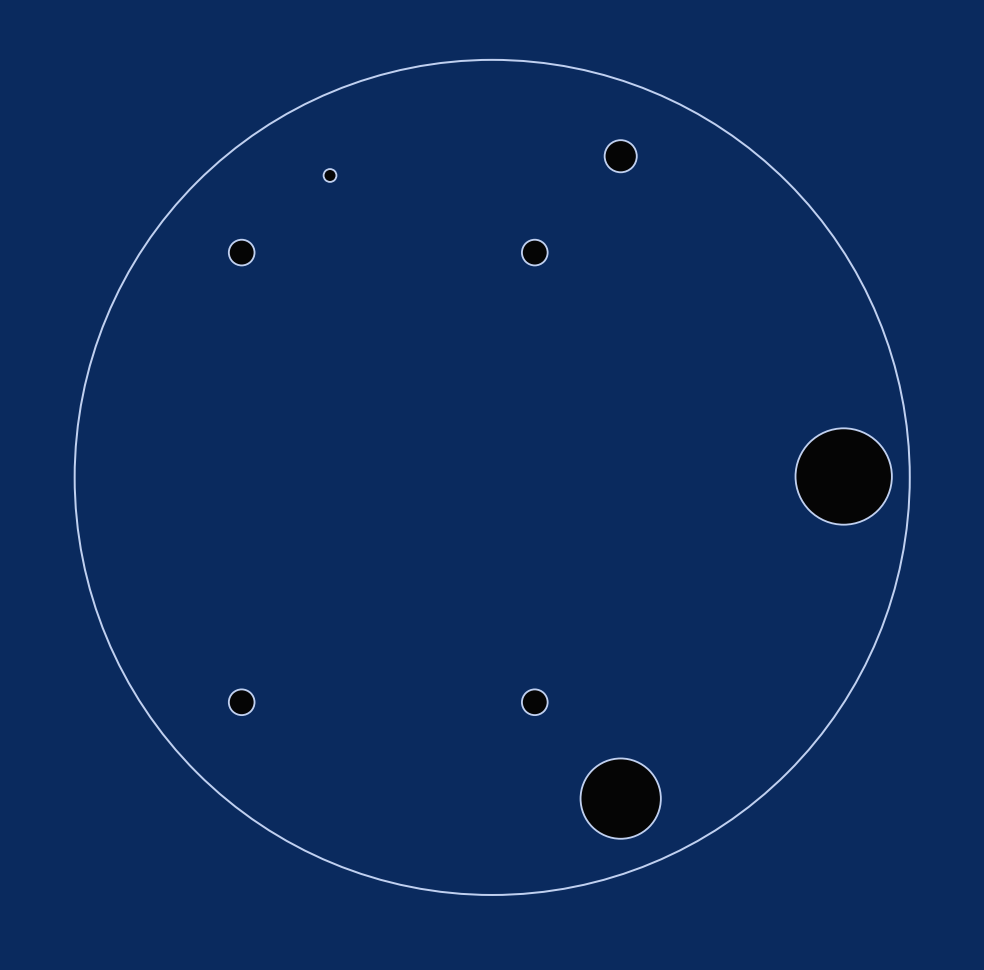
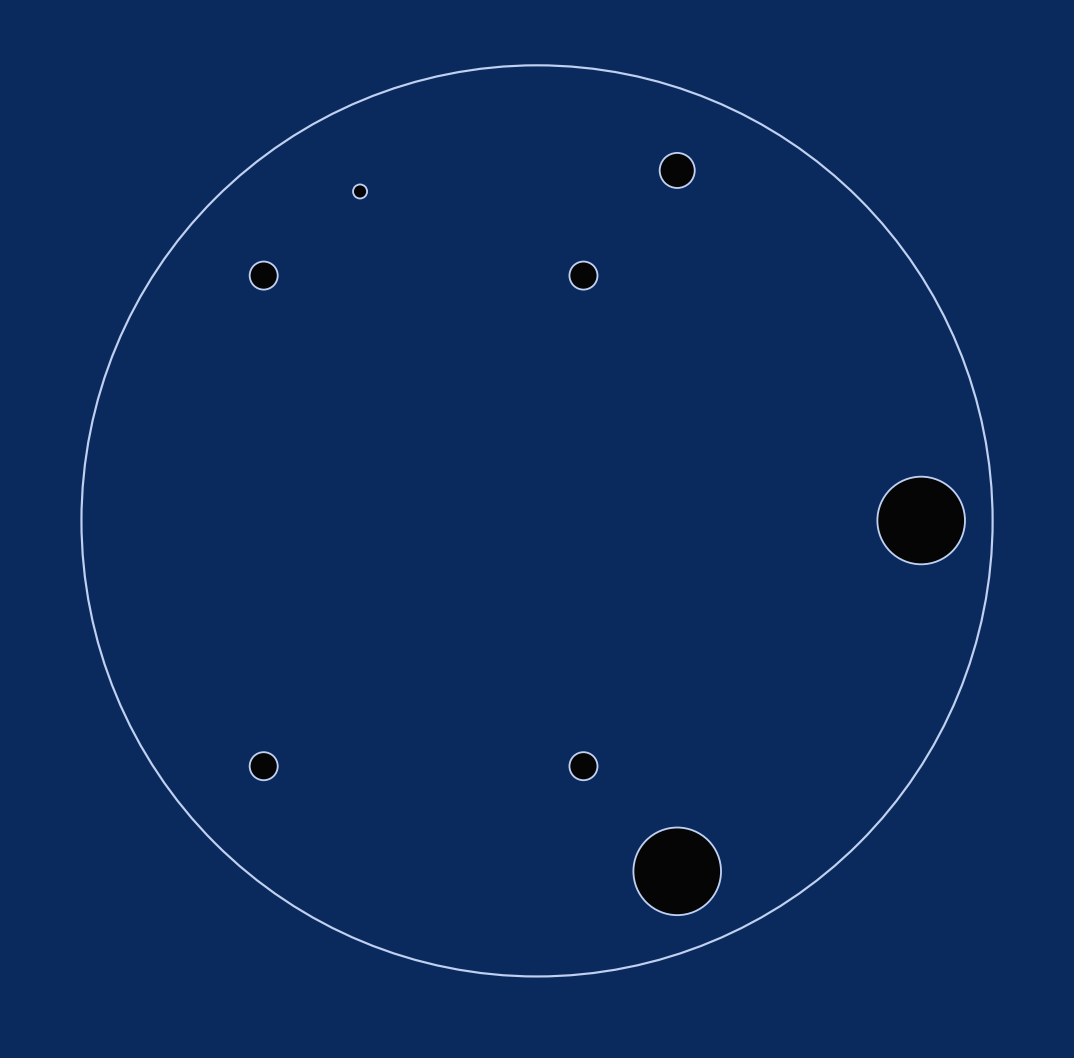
hole size: [795, 428, 892, 525] -> [877, 476, 965, 565]

